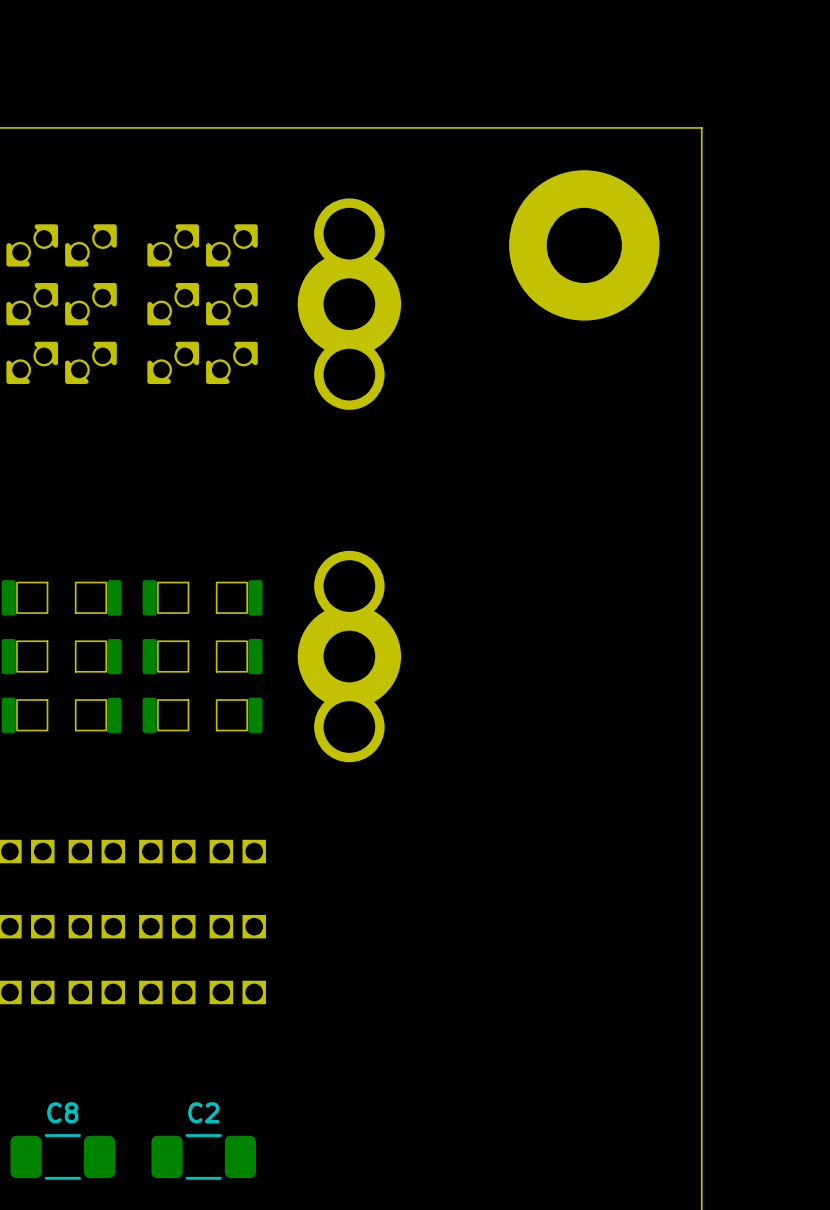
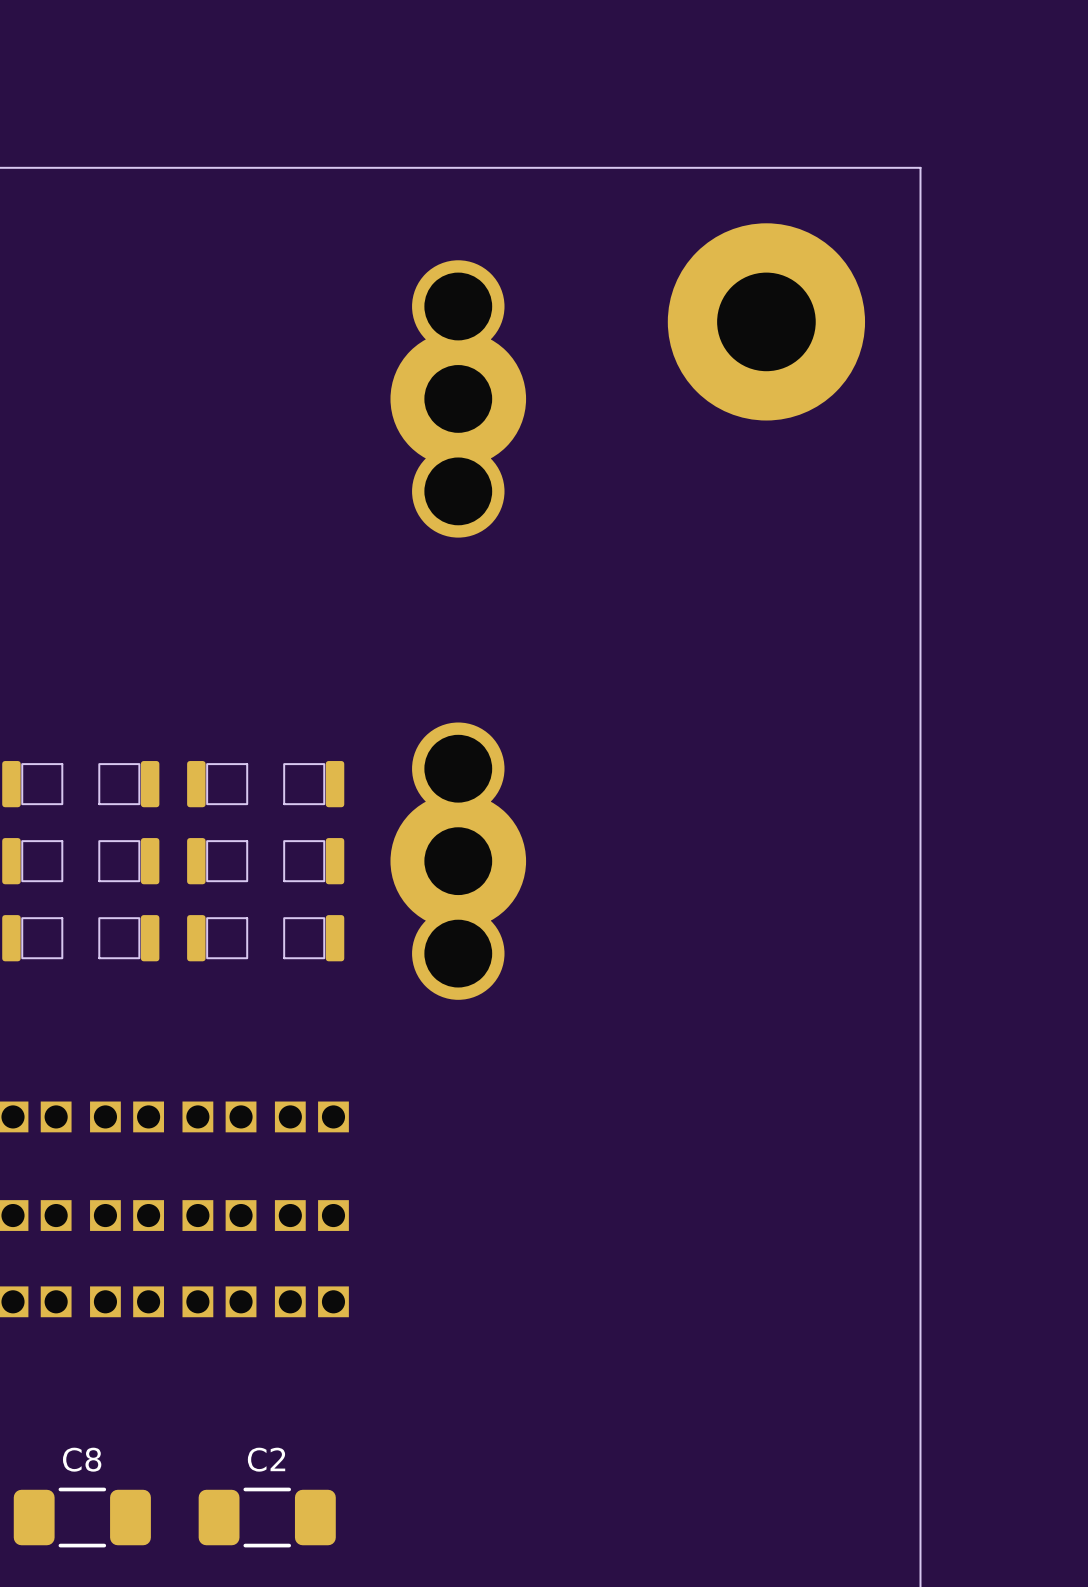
part: (32, 245) -> none
part: (90, 245) -> none
part: (173, 245) -> none
part: (231, 245) -> none
part: (32, 304) -> none
part: (90, 304) -> none
part: (173, 304) -> none
part: (231, 304) -> none
part: (32, 362) -> none
part: (90, 362) -> none
part: (173, 362) -> none
part: (231, 362) -> none

